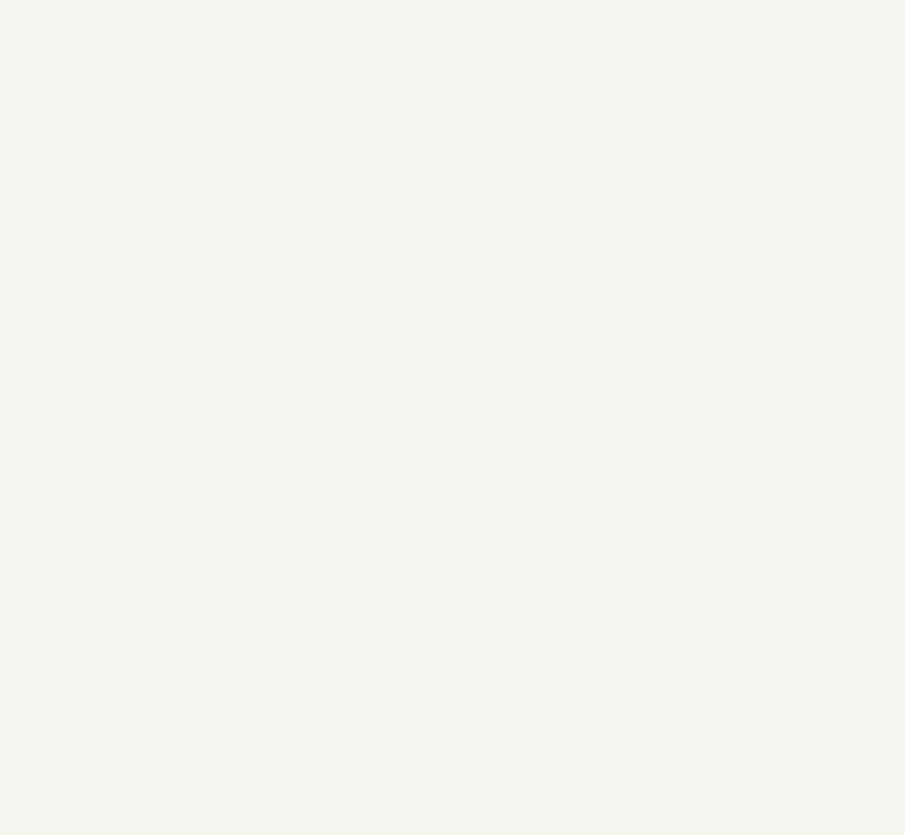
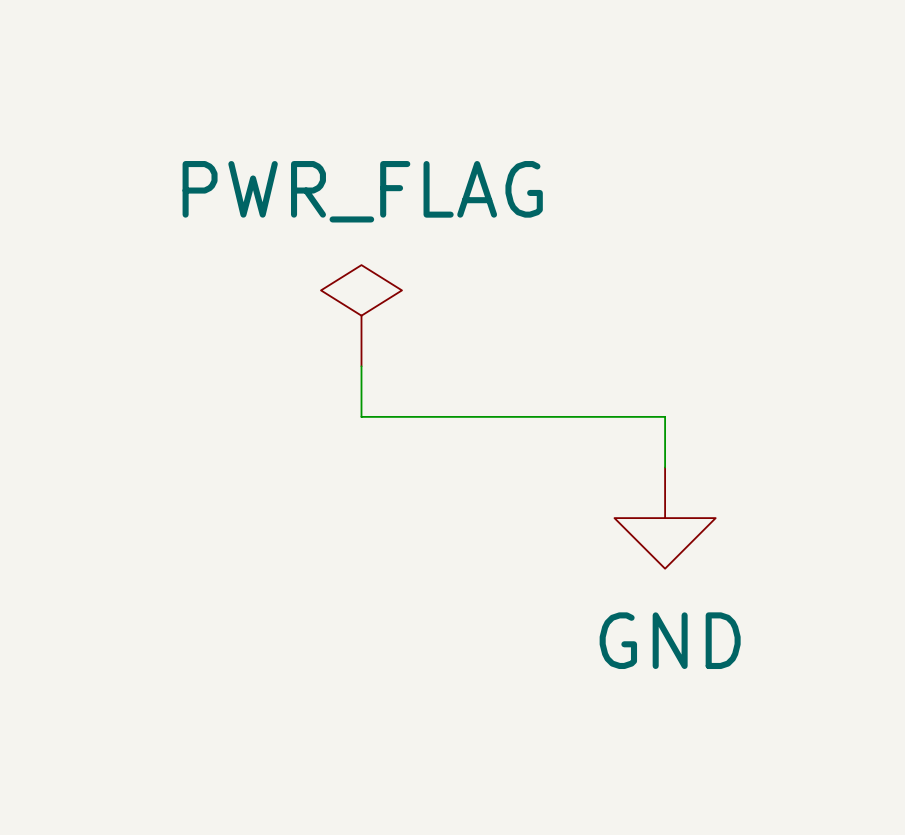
power symbol: none -> PWR_FLAG (361, 315)
wire: none -> (361, 366) (361, 416) (665, 416) (665, 467)
power symbol: none -> GND (665, 518)

